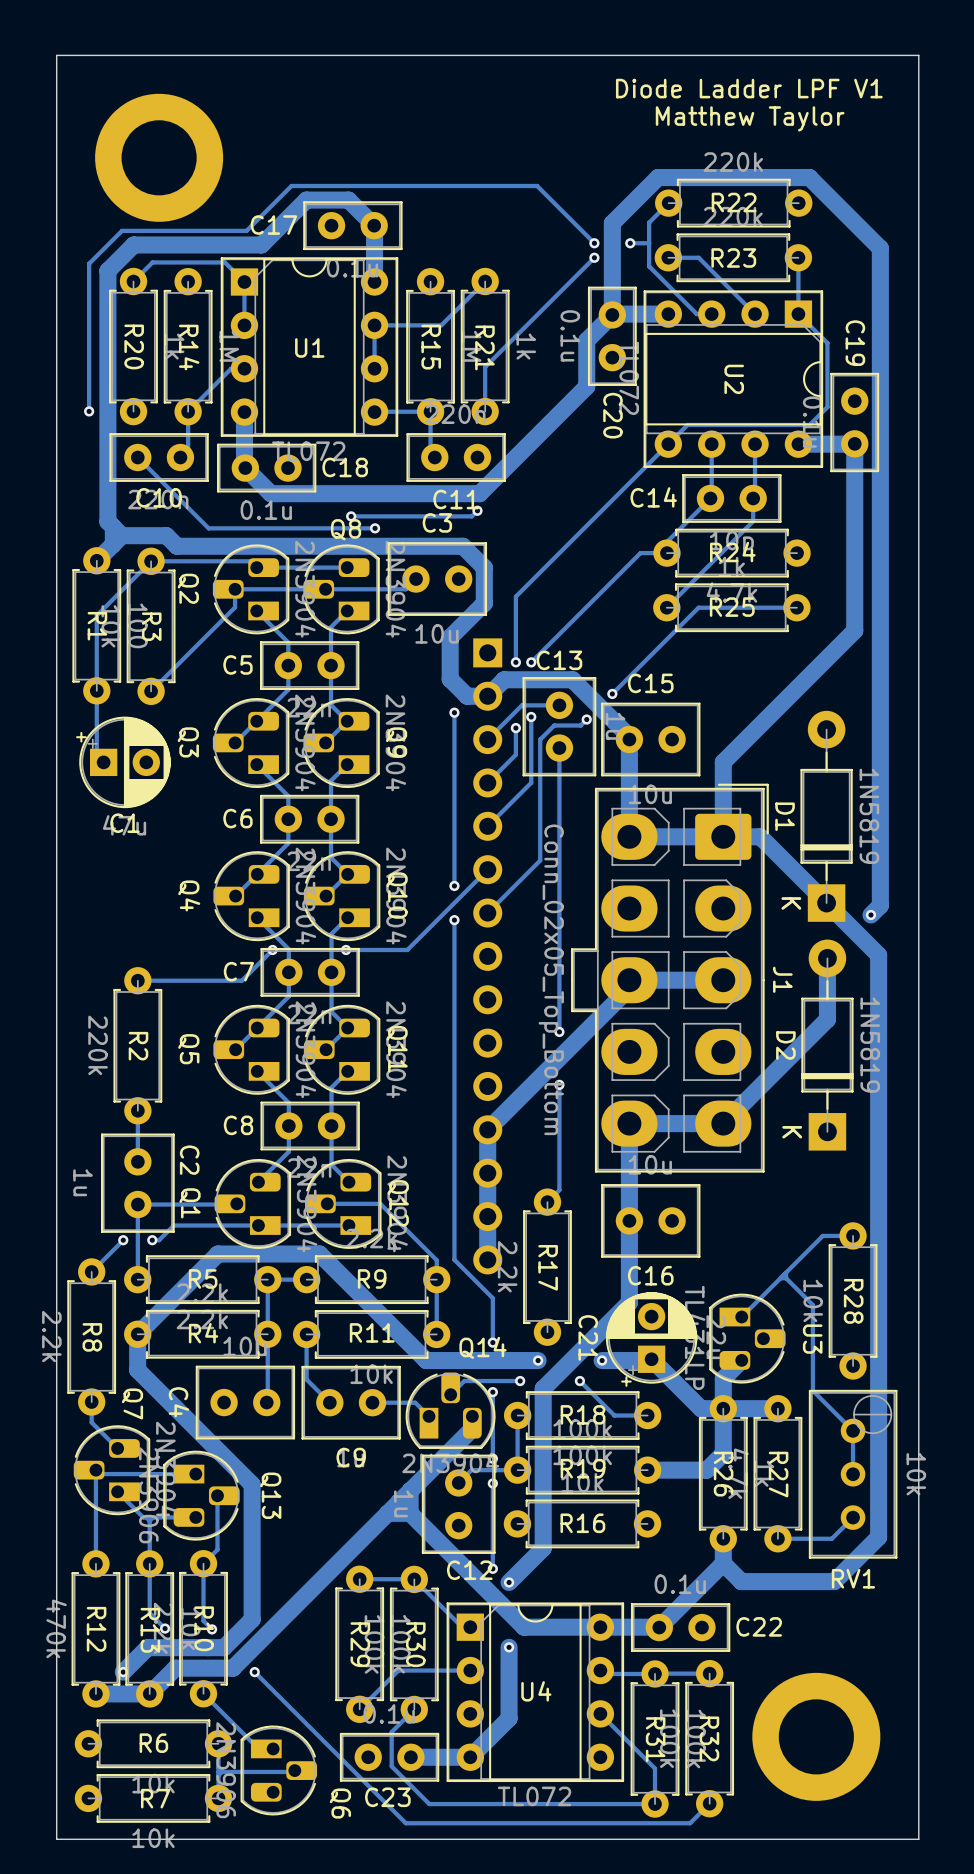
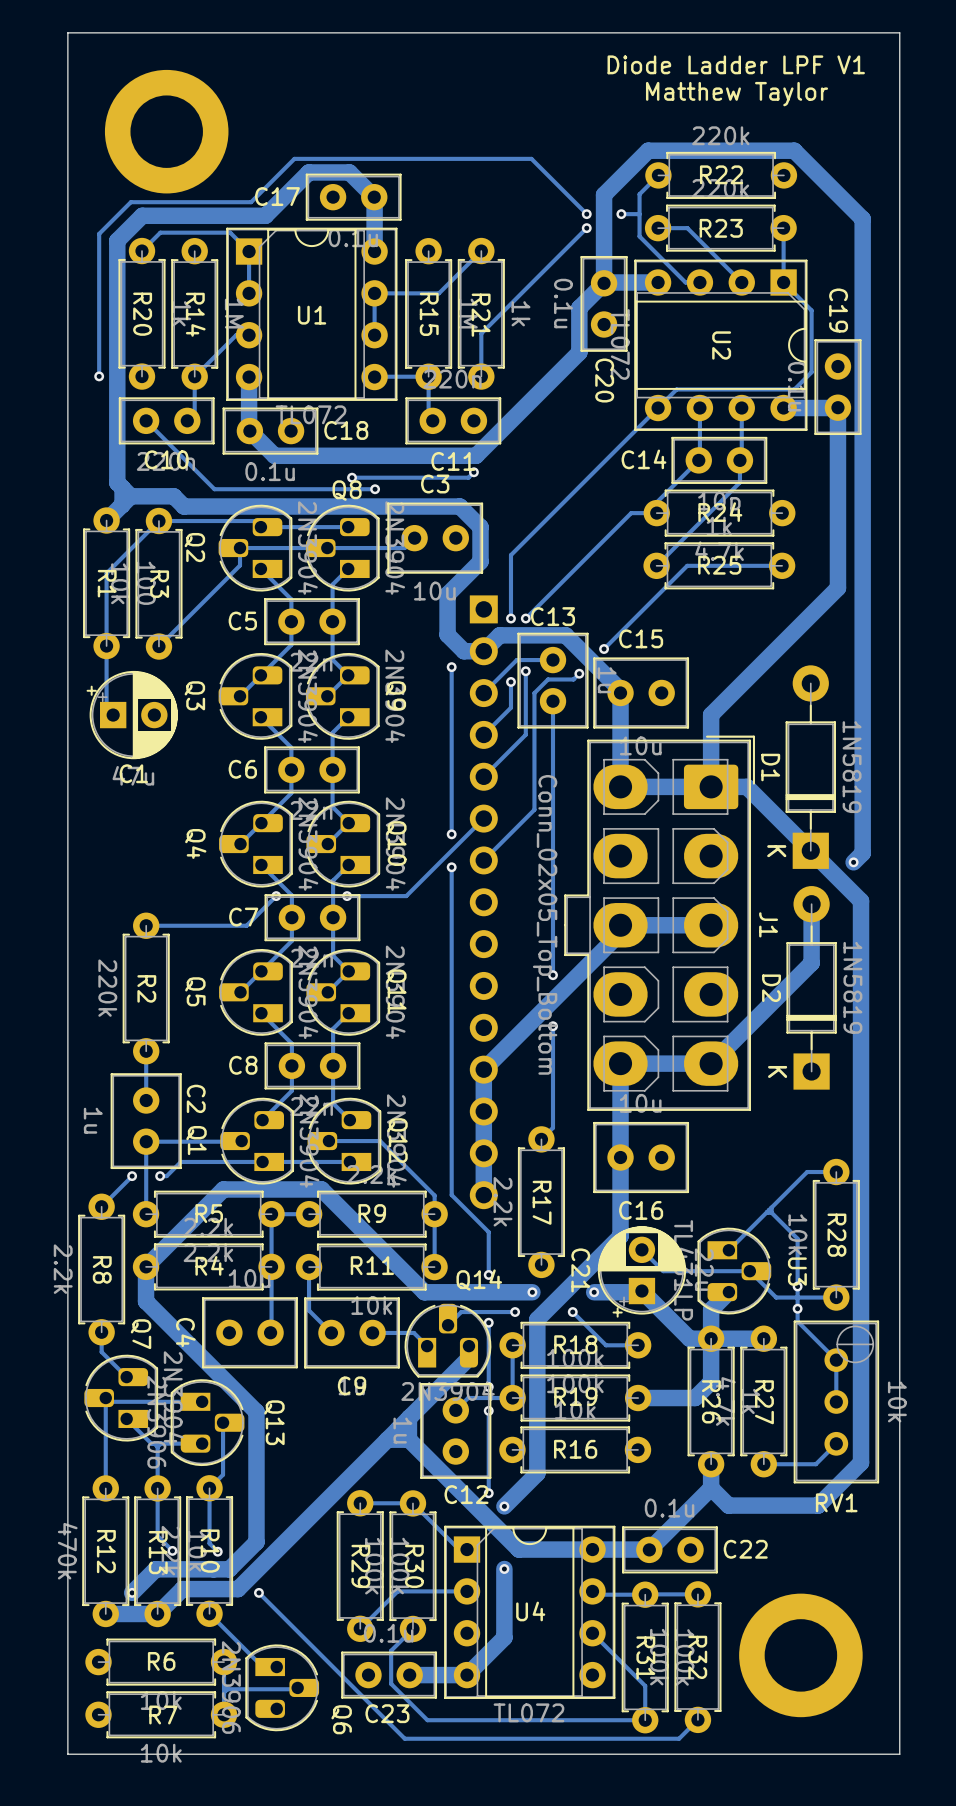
track: none -> (641, 1249) (663, 1271) (749, 1271) (776, 1297) (836, 1297)
via: none -> (797, 1286)
via: none -> (797, 1308)

